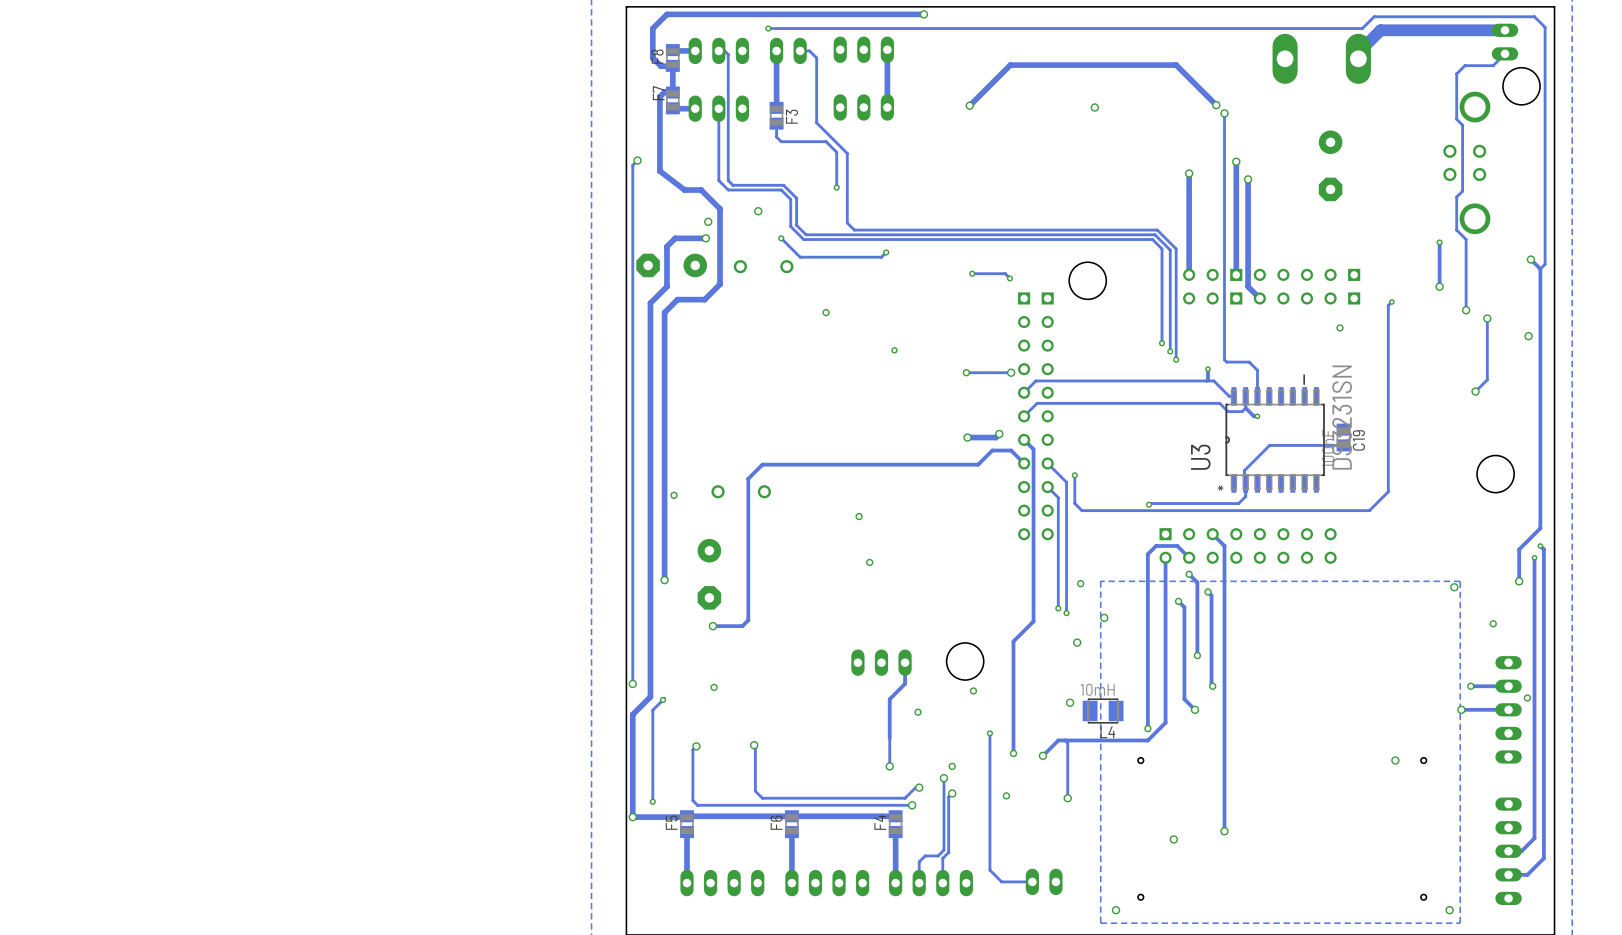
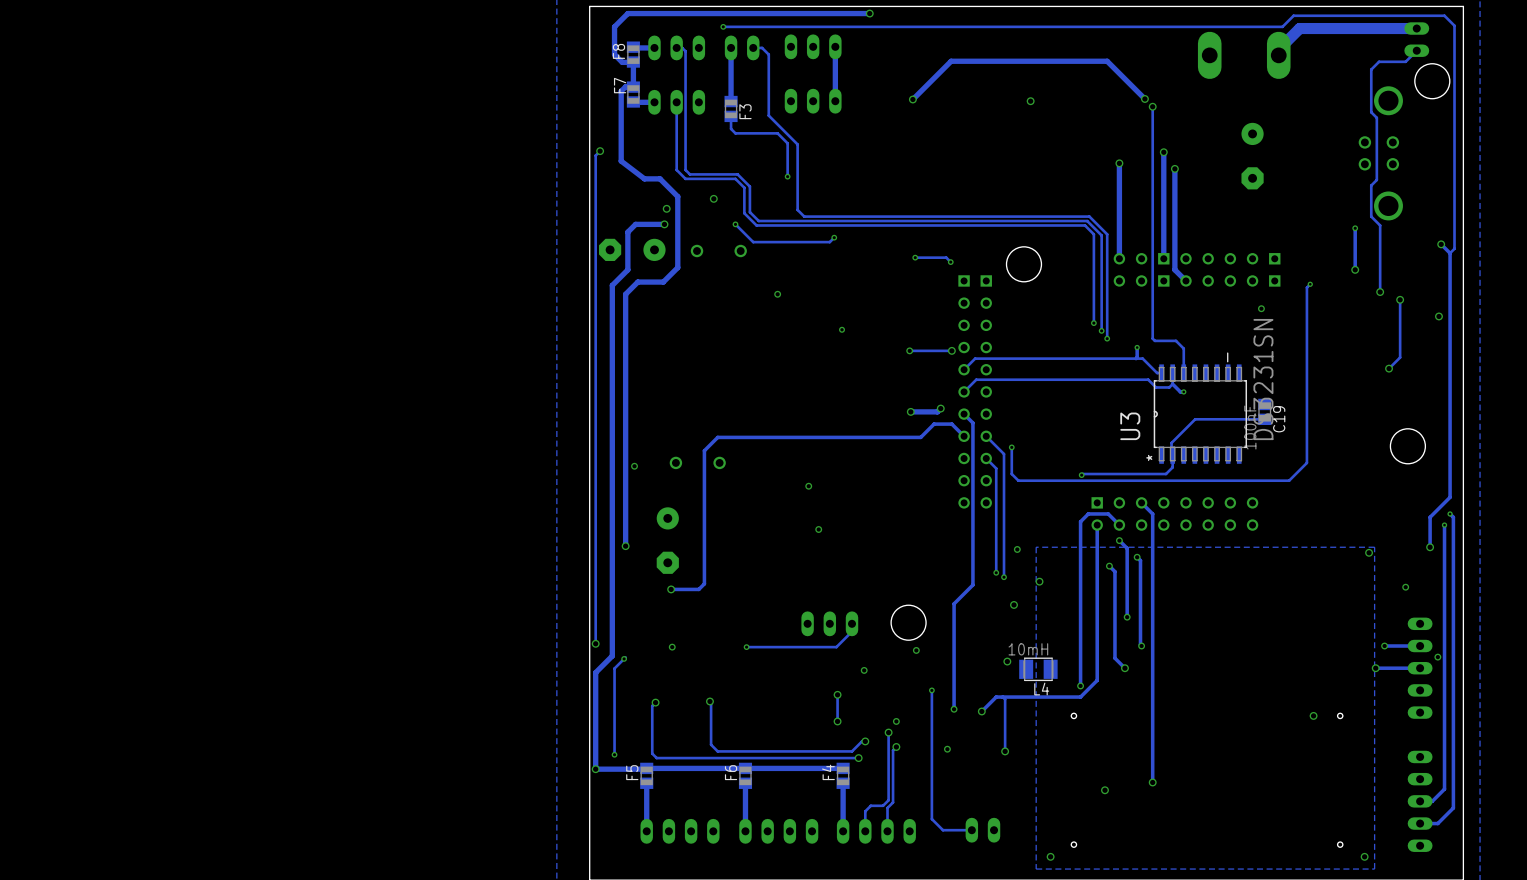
track: (905, 670) (905, 683) (889, 699) (889, 738) -> (851, 631) (836, 647) (746, 647)
via: none -> (746, 647)
via: none -> (837, 694)

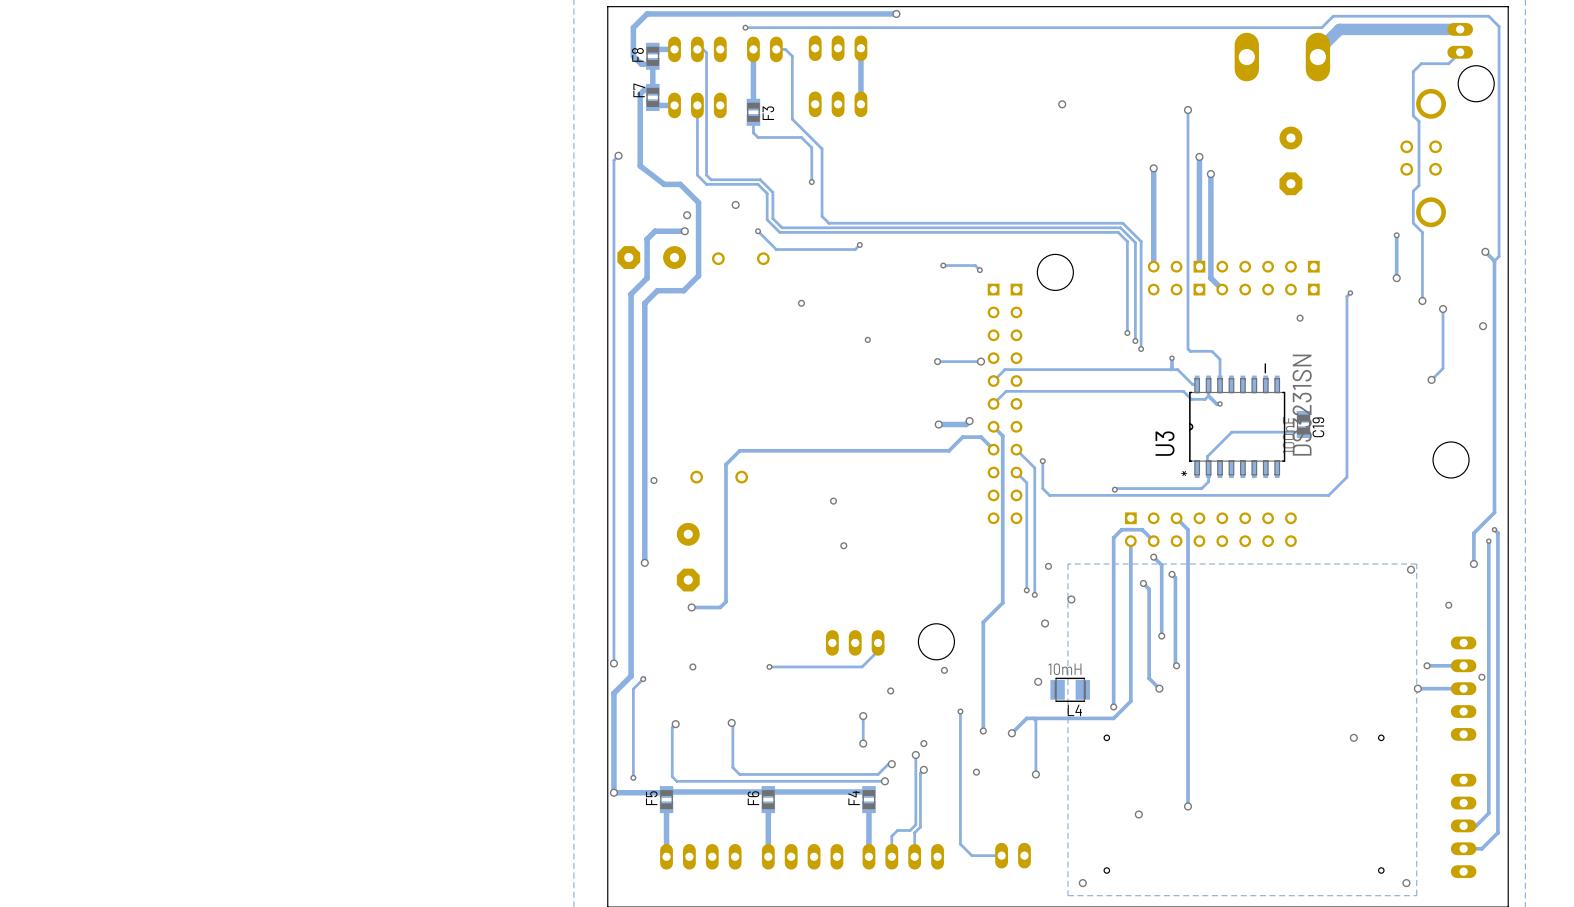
track: (1144, 98) (1107, 61) (951, 61) (912, 99) -> none
via: (1144, 98) -> none
via: (912, 99) -> none

